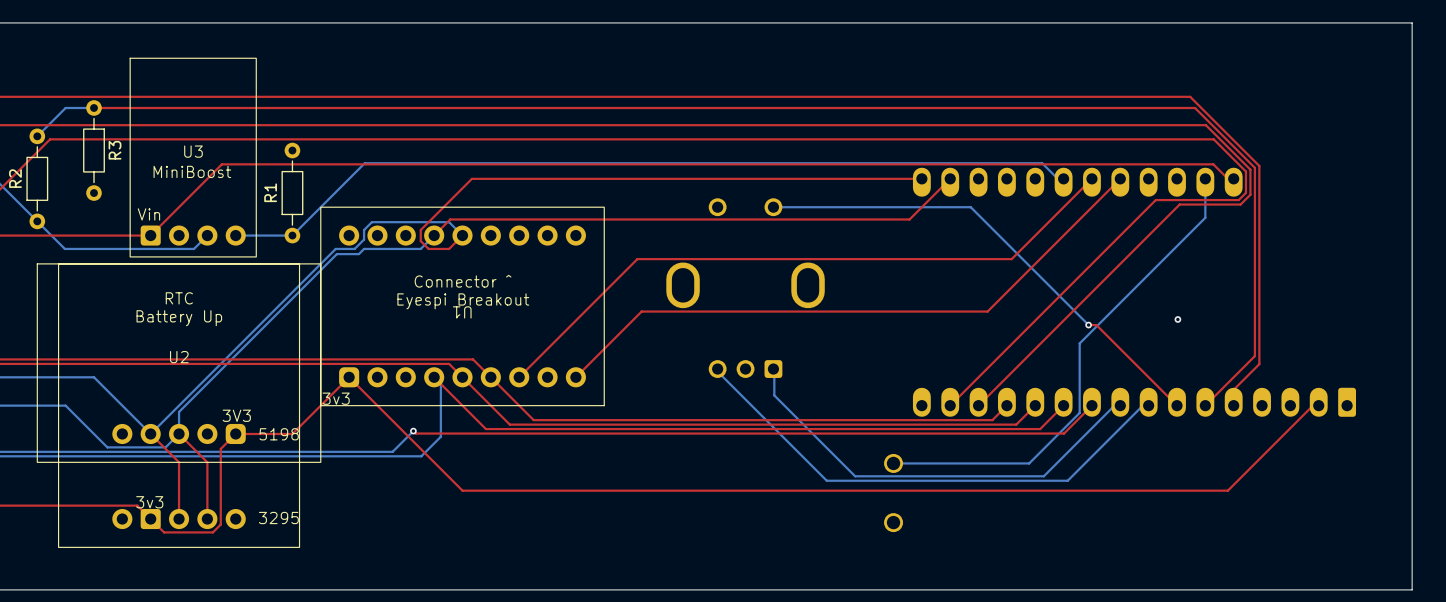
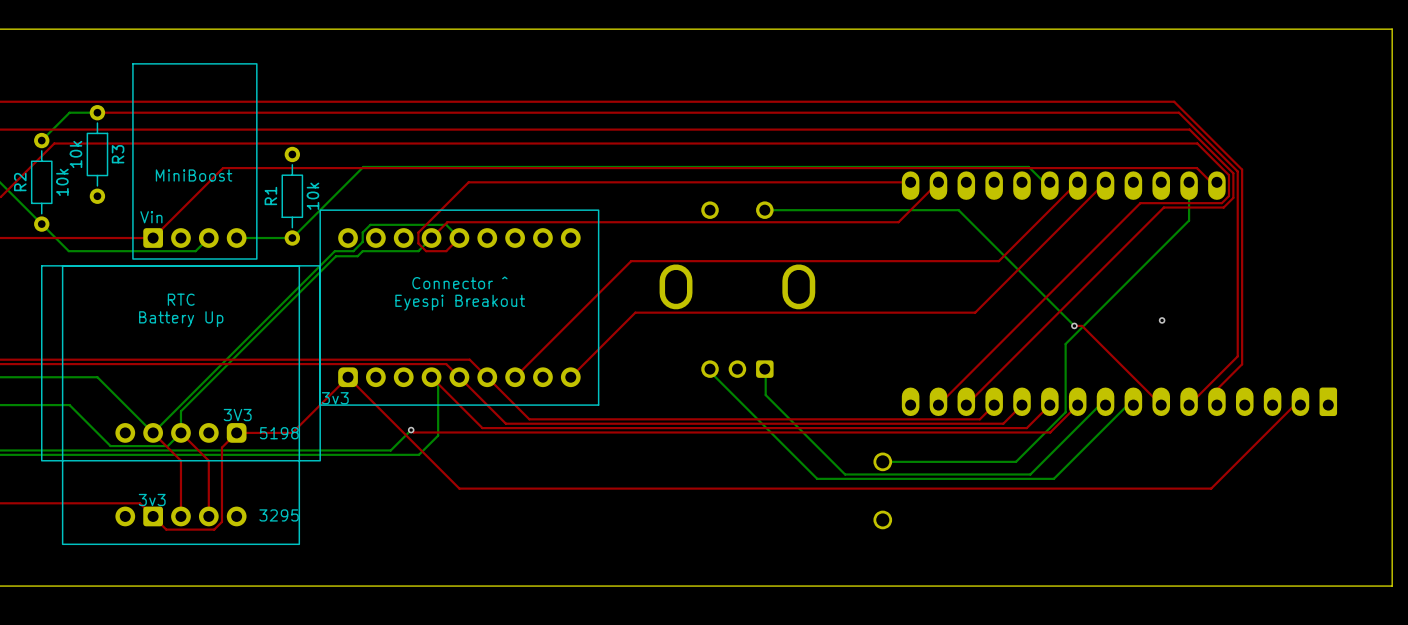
R3 value: none -> 10k (75, 154)
U3 name: U3 (193, 151) -> none
R2 value: none -> 10k (62, 182)
R1 value: none -> 10k (312, 196)
U1 name: U1 (462, 312) -> none
U2 name: U2 (179, 357) -> none

